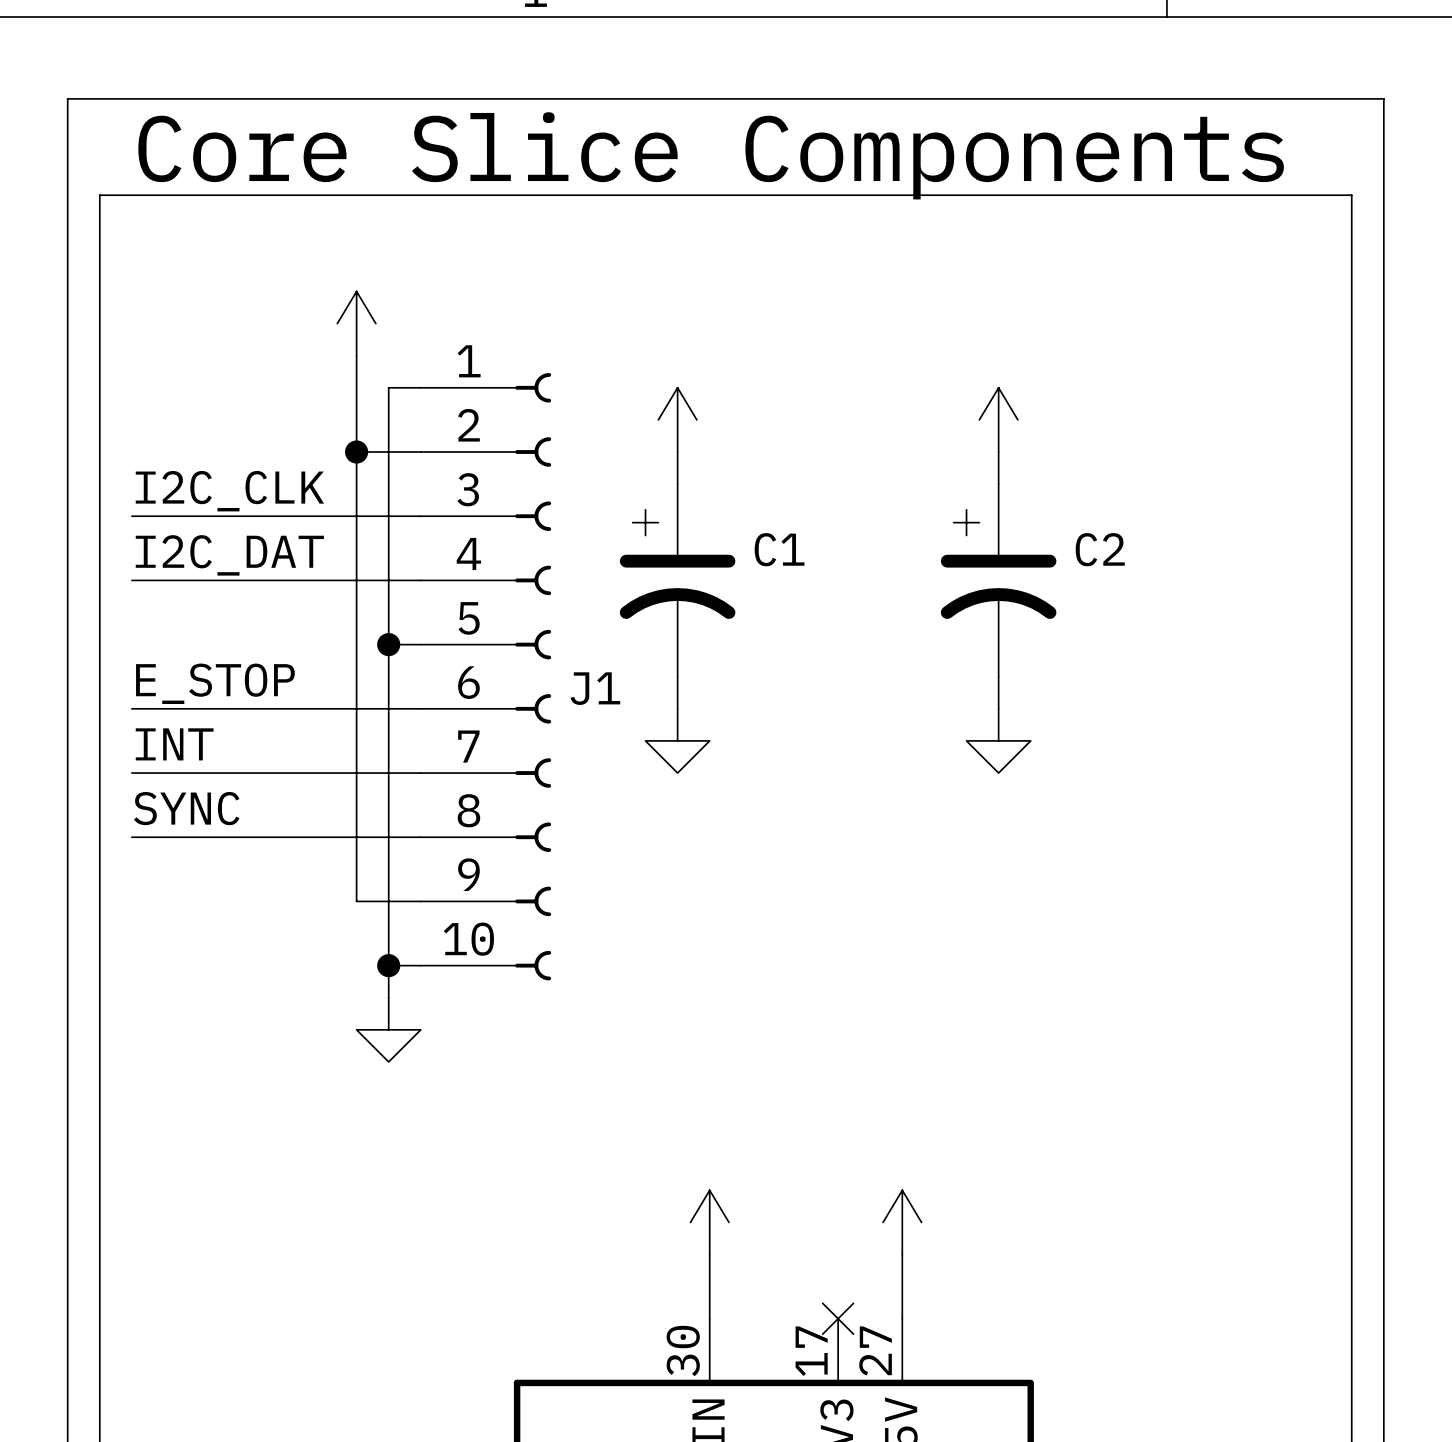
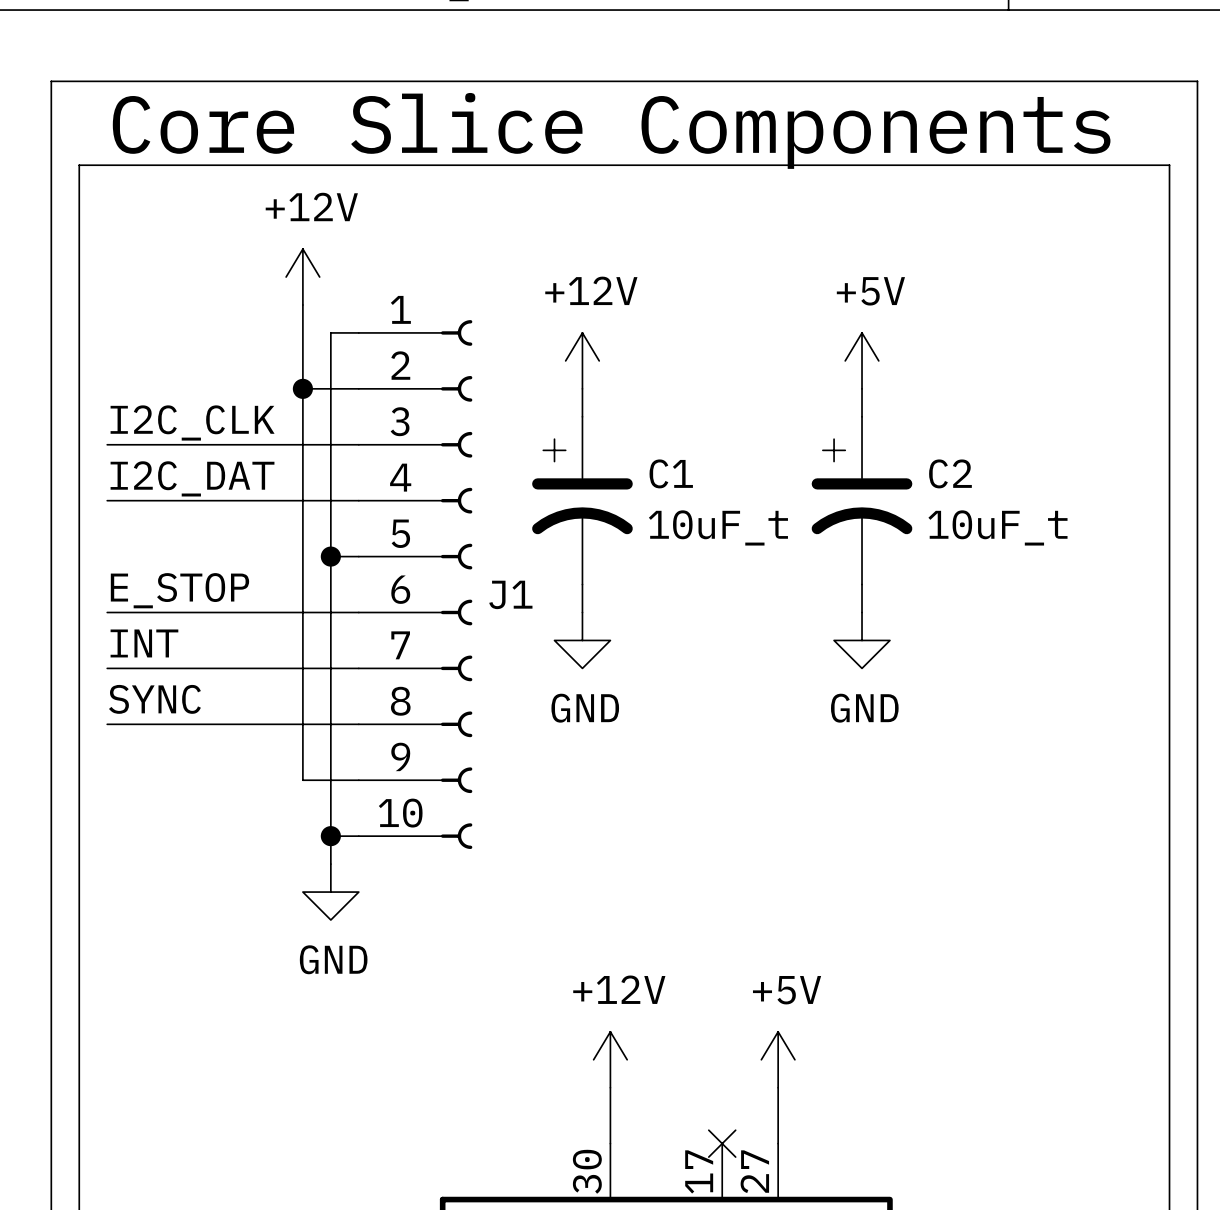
power symbol text: none -> +12V (311, 206)
power symbol text: none -> +12V (591, 290)
power symbol text: none -> +5V (870, 291)
C1 value: none -> 10uF_t (718, 527)
C2 value: none -> 10uF_t (997, 527)
power symbol text: none -> GND (585, 708)
power symbol text: none -> GND (864, 708)
power symbol text: none -> GND (333, 959)
power symbol text: none -> +12V (619, 989)
power symbol text: none -> +5V (787, 990)

